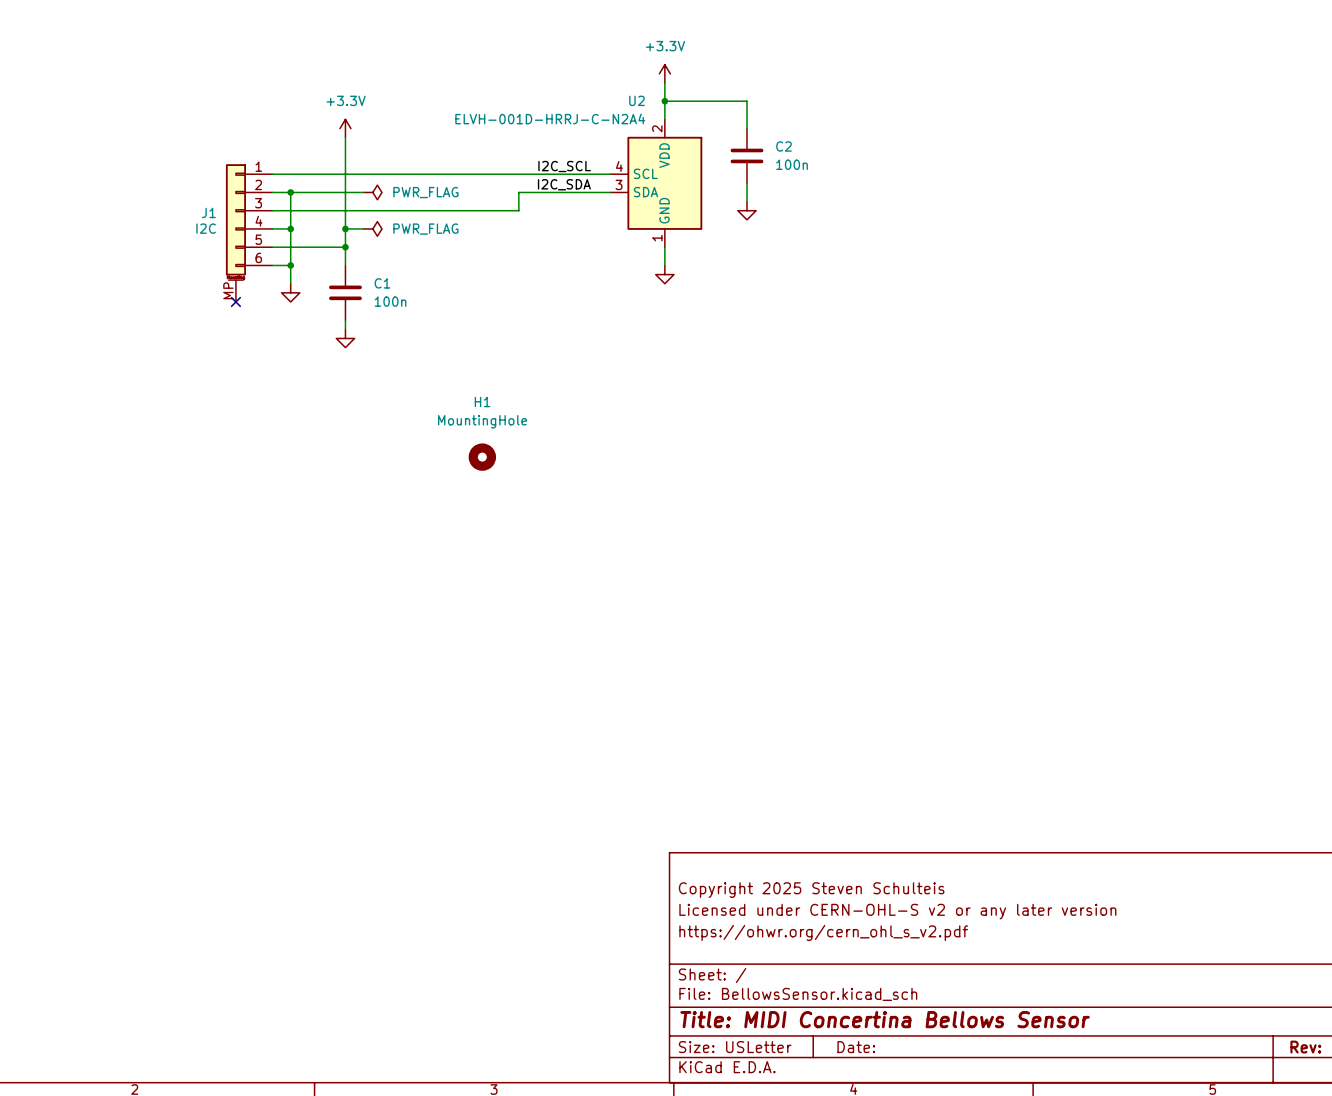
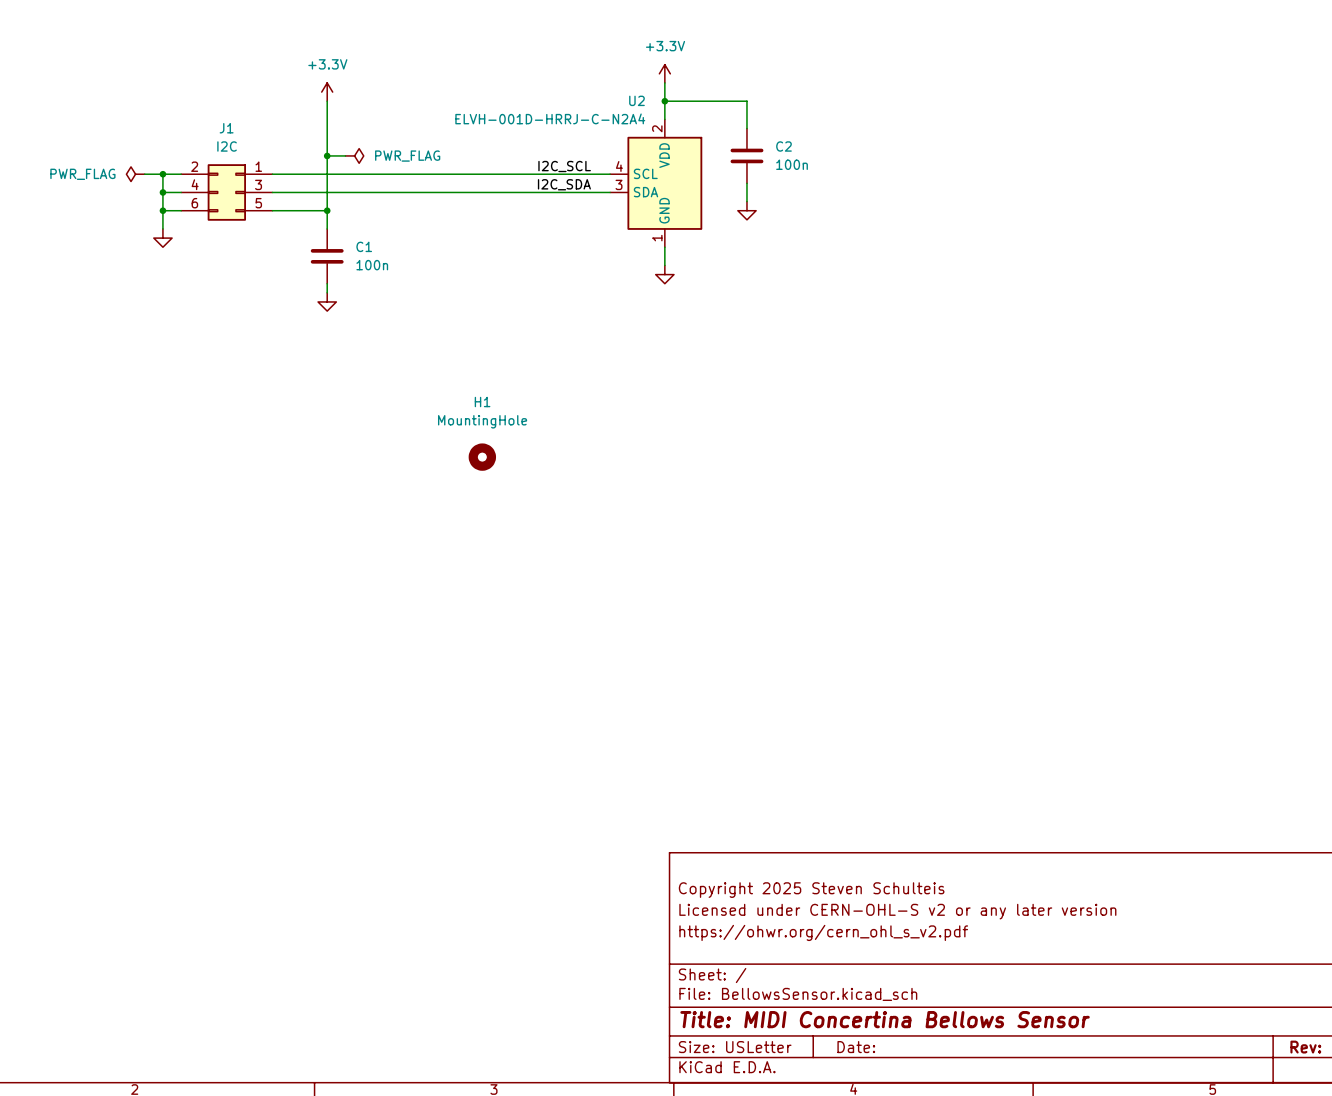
power symbol position: +3.3V (345, 128) -> +3.3V (327, 92)
wire: (345, 137) (345, 265) -> (327, 101) (327, 228)
J1 value: none -> I2C (227, 146)
junction: none -> (327, 155)
power symbol: none -> PWR_FLAG (354, 155)
J1 symbol: [225, 164, 273, 302] -> [181, 164, 273, 221]
power symbol: none -> PWR_FLAG (135, 174)
wire: none -> (144, 174) (181, 174)
wire: none -> (162, 174) (162, 228)
junction: none -> (162, 174)
junction: none -> (162, 192)
wire: (290, 192) (290, 283) -> none
junction: (290, 192) -> none
power symbol: PWR_FLAG (372, 192) -> none
wire: (518, 192) (518, 210) (327, 210) -> (518, 192) (363, 192)
junction: none -> (162, 210)
junction: none -> (327, 210)
J1 name position: J1 (208, 212) -> J1 (226, 128)
J1 text: I2C (206, 228) -> none
wire: (272, 228) (290, 228) -> (162, 210) (181, 210)
junction: (290, 228) -> none
wire: (345, 228) (363, 228) -> (327, 155) (345, 155)
junction: (345, 228) -> none
power symbol: PWR_FLAG (372, 228) -> none
power symbol: none -> (162, 238)
wire: (272, 247) (345, 247) -> none
junction: (345, 247) -> none
wire: (272, 265) (290, 265) -> (162, 192) (181, 192)
junction: (290, 265) -> none
power symbol: (290, 292) -> none
C1 position: (345, 292) -> (327, 256)
no-connect mark: (235, 301) -> none
power symbol: none -> (327, 301)
wire: (345, 320) (345, 329) -> (327, 283) (327, 292)
power symbol: (345, 338) -> none

